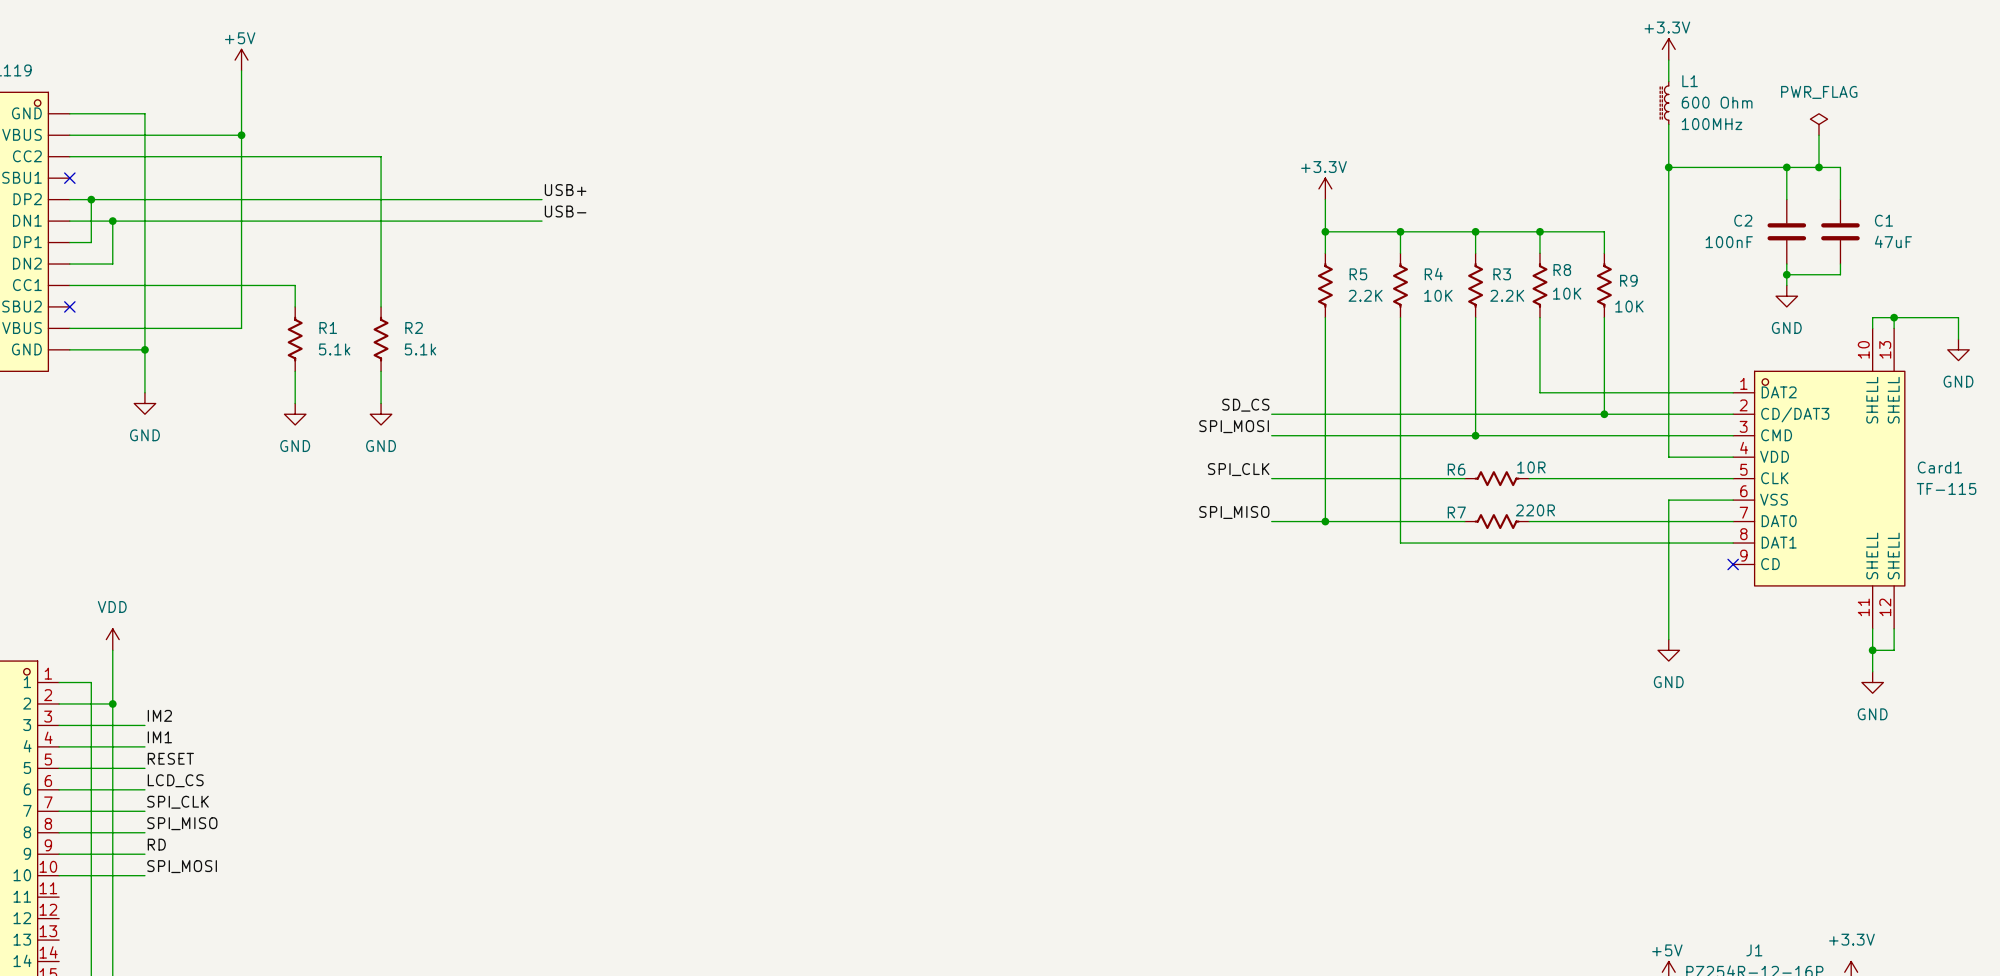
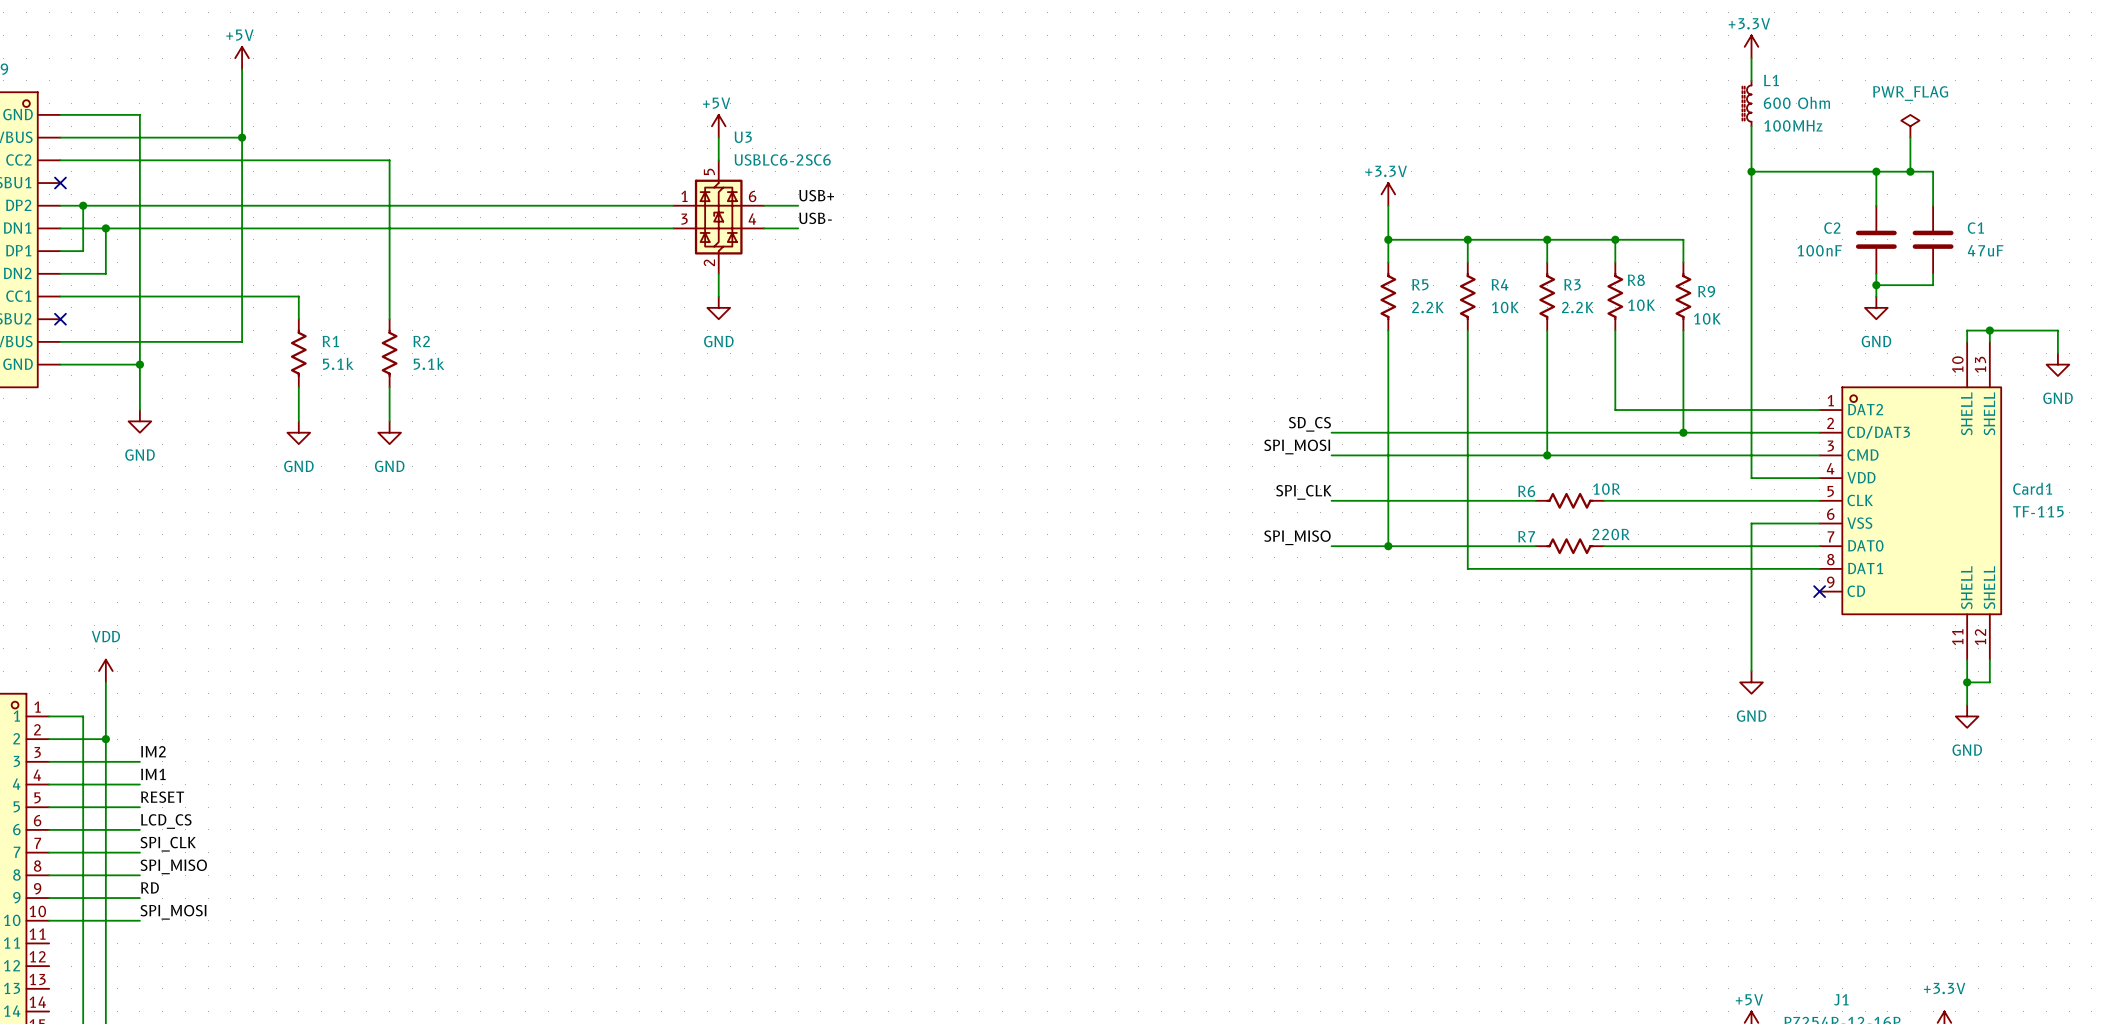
power symbol: none -> +5V (718, 126)
wire: none -> (718, 137) (718, 160)
label: USB+ (565, 190) -> none
label: none -> USB+ (816, 195)
wire: none -> (559, 205) (673, 205)
wire: none -> (764, 205) (798, 205)
U3: none -> USBLC6-2SC6 (718, 217)
label: USB- (565, 211) -> none
label: none -> USB- (815, 218)
wire: none -> (559, 228) (673, 228)
wire: none -> (764, 228) (798, 228)
wire: none -> (718, 273) (718, 296)
power symbol: none -> GND (718, 307)

